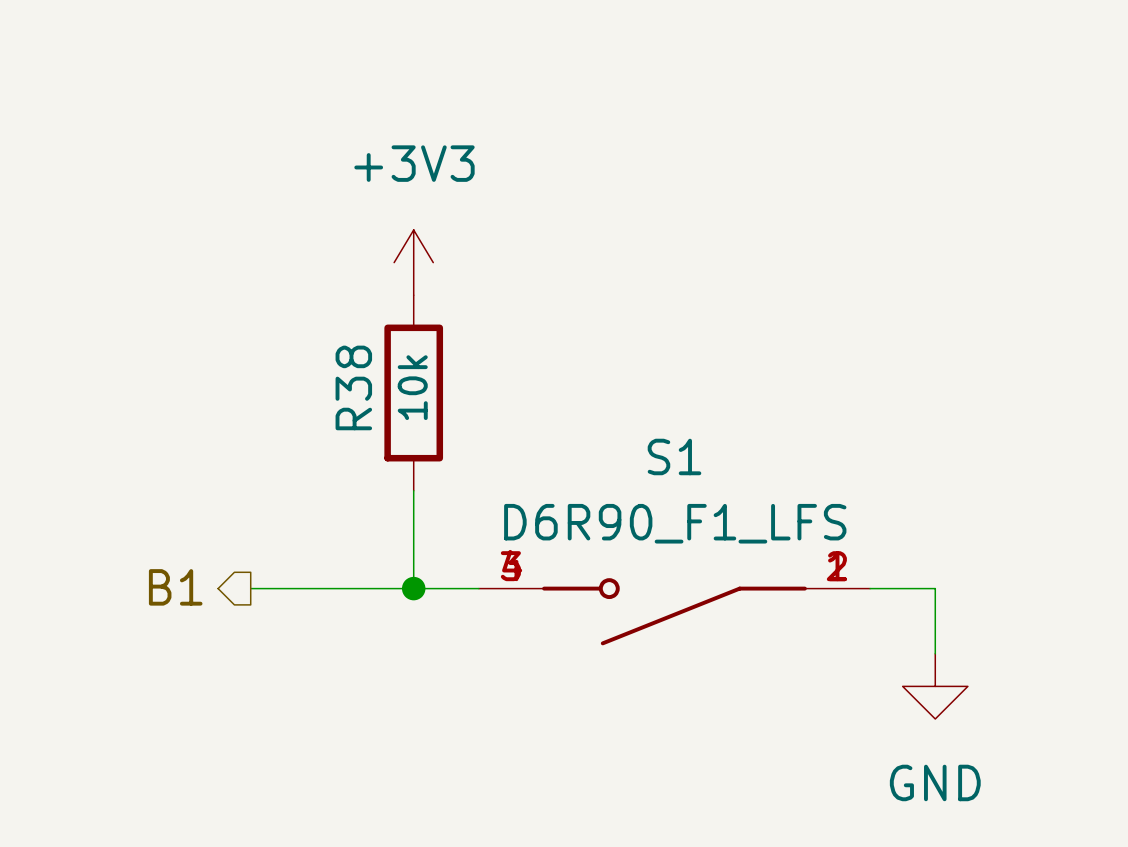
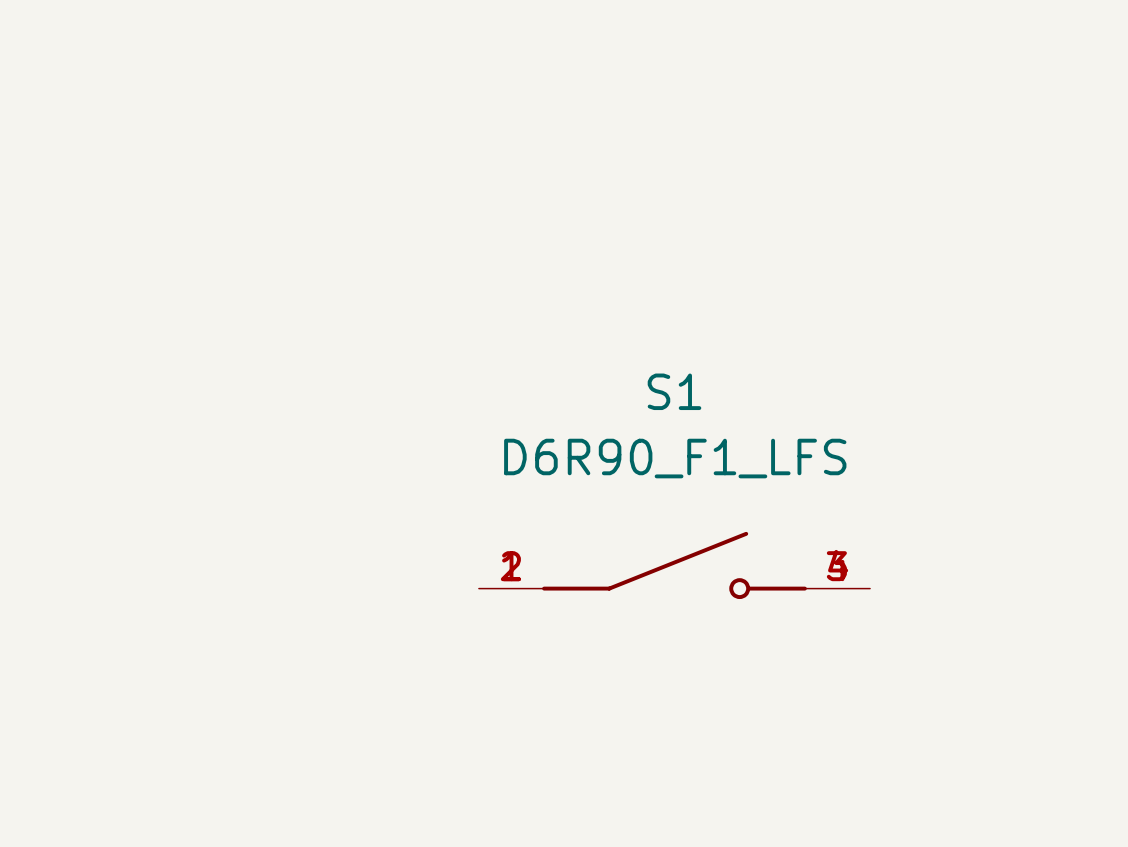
power symbol: +3V3 (413, 262) -> none
R38: 10k (413, 393) -> none
wire: (413, 490) (413, 588) -> none
hierarchical label: B1 (175, 587) -> none
wire: (250, 588) (478, 588) -> none
junction: (413, 588) -> none
wire: (870, 588) (935, 588) (935, 653) -> none
S1 rotation: 0° (674, 611) -> 180° (674, 565)
power symbol: GND (935, 686) -> none

